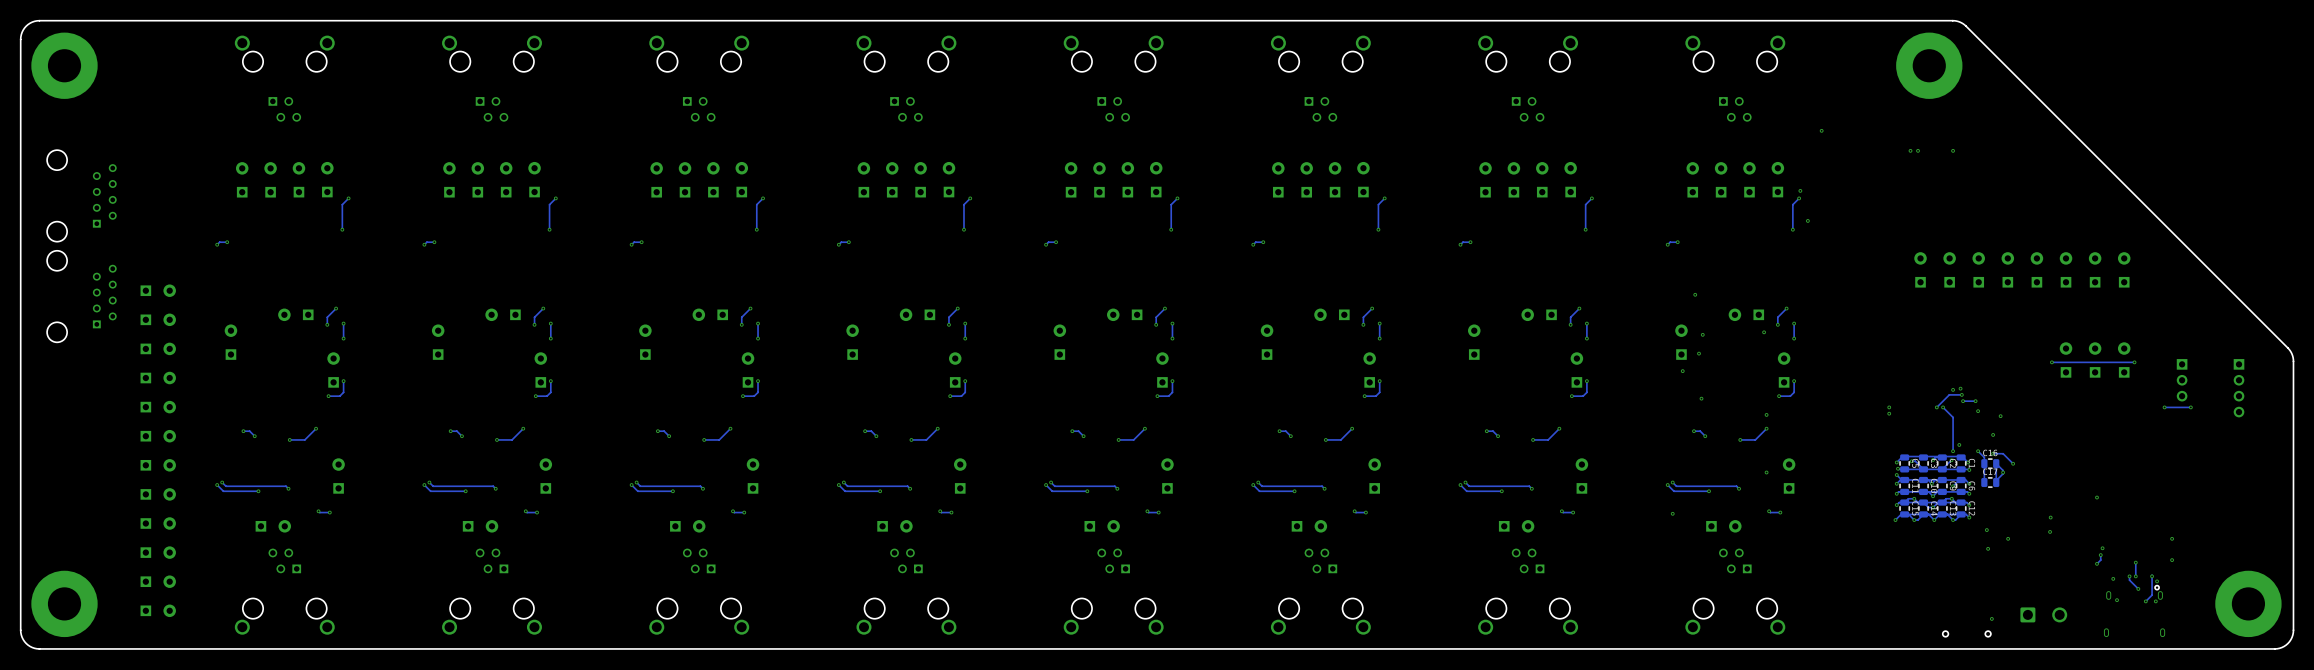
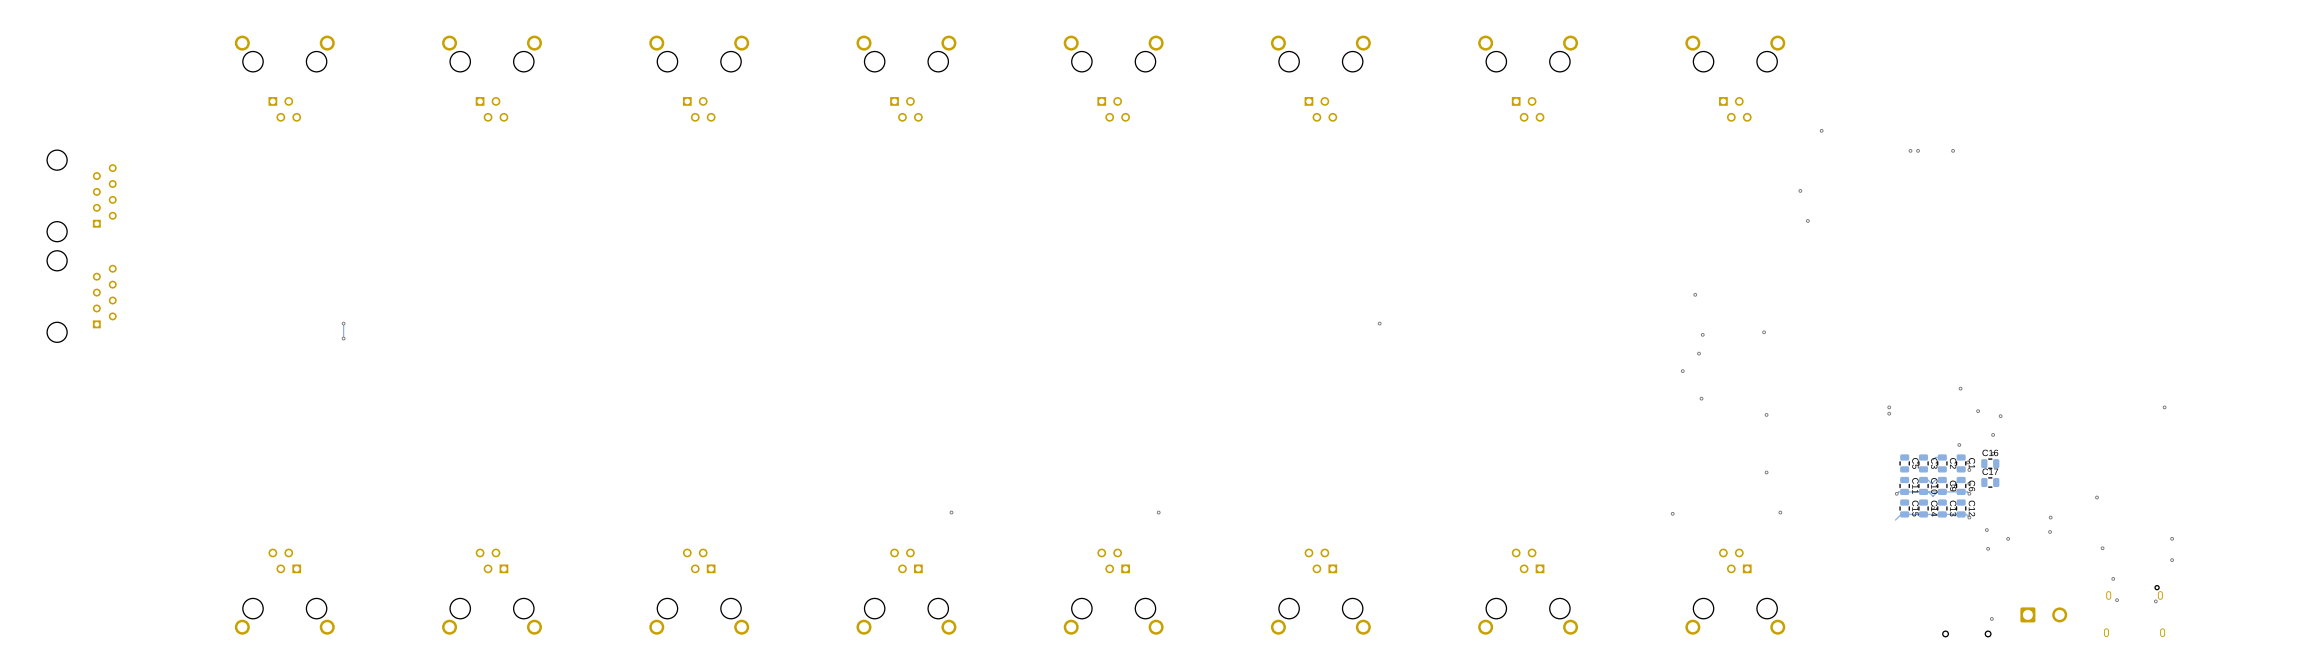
board edge: (1952, 20) (34, 21) (24, 28) (20, 39) (21, 635) (28, 645) (39, 648) (2274, 648) (2284, 646) (2290, 639) (2293, 630) (2293, 361) (2291, 352) (1966, 26) (1952, 20) -> none
part: (64, 65) -> none
part: (1929, 65) -> none
part: (242, 179) -> none
part: (270, 179) -> none
part: (298, 179) -> none
part: (327, 179) -> none
part: (449, 179) -> none
part: (477, 179) -> none
part: (506, 179) -> none
part: (534, 179) -> none
part: (656, 179) -> none
part: (685, 179) -> none
part: (713, 179) -> none
part: (741, 179) -> none
part: (863, 179) -> none
part: (892, 179) -> none
part: (920, 179) -> none
part: (948, 179) -> none
part: (1071, 179) -> none
part: (1099, 179) -> none
part: (1127, 179) -> none
part: (1156, 179) -> none
part: (1278, 179) -> none
part: (1306, 179) -> none
part: (1335, 179) -> none
part: (1363, 179) -> none
part: (1485, 179) -> none
part: (1513, 179) -> none
part: (1542, 179) -> none
part: (1570, 179) -> none
part: (1692, 179) -> none
part: (1721, 179) -> none
part: (1749, 179) -> none
part: (1777, 179) -> none
track: (348, 198) (342, 204) (342, 229) -> none
via: (348, 198) -> none
track: (555, 198) (549, 204) (549, 229) -> none
via: (555, 198) -> none
track: (763, 198) (756, 204) (756, 229) -> none
via: (763, 198) -> none
track: (970, 198) (963, 204) (963, 229) -> none
via: (970, 198) -> none
track: (1177, 198) (1171, 204) (1171, 229) -> none
via: (1177, 198) -> none
track: (1384, 198) (1378, 204) (1378, 229) -> none
via: (1384, 198) -> none
track: (1591, 198) (1585, 204) (1585, 229) -> none
via: (1591, 198) -> none
track: (1799, 198) (1792, 204) (1792, 229) -> none
via: (1799, 198) -> none
via: (342, 229) -> none
via: (549, 229) -> none
via: (756, 229) -> none
via: (963, 229) -> none
via: (1171, 229) -> none
via: (1378, 229) -> none
via: (1585, 229) -> none
via: (1792, 229) -> none
track: (227, 242) (219, 242) (217, 244) -> none
via: (227, 242) -> none
track: (434, 242) (426, 242) (424, 244) -> none
via: (434, 242) -> none
track: (641, 242) (634, 242) (631, 244) -> none
via: (641, 242) -> none
track: (848, 242) (841, 242) (838, 244) -> none
via: (848, 242) -> none
track: (1056, 242) (1048, 242) (1046, 244) -> none
via: (1056, 242) -> none
track: (1263, 242) (1255, 242) (1253, 244) -> none
via: (1263, 242) -> none
track: (1470, 242) (1463, 242) (1460, 244) -> none
via: (1470, 242) -> none
track: (1677, 242) (1670, 242) (1667, 244) -> none
via: (1677, 242) -> none
via: (217, 244) -> none
via: (424, 244) -> none
via: (631, 244) -> none
via: (838, 244) -> none
via: (1046, 244) -> none
via: (1253, 244) -> none
via: (1460, 244) -> none
via: (1667, 244) -> none
part: (1920, 269) -> none
part: (1949, 269) -> none
part: (1978, 269) -> none
part: (2007, 269) -> none
part: (2036, 269) -> none
part: (2066, 269) -> none
part: (2095, 269) -> none
part: (2124, 269) -> none
part: (158, 290) -> none
track: (336, 308) (327, 317) (327, 324) -> none
via: (336, 308) -> none
track: (543, 308) (534, 317) (534, 324) -> none
via: (543, 308) -> none
track: (750, 308) (741, 317) (741, 324) -> none
via: (750, 308) -> none
track: (957, 308) (948, 317) (948, 324) -> none
via: (957, 308) -> none
track: (1164, 308) (1156, 317) (1156, 324) -> none
via: (1164, 308) -> none
track: (1372, 308) (1363, 317) (1363, 324) -> none
via: (1372, 308) -> none
track: (1579, 308) (1570, 317) (1570, 324) -> none
via: (1579, 308) -> none
track: (1786, 308) (1777, 317) (1777, 324) -> none
via: (1786, 308) -> none
part: (295, 314) -> none
part: (503, 314) -> none
part: (710, 314) -> none
part: (917, 314) -> none
part: (1124, 314) -> none
part: (1331, 314) -> none
part: (1539, 314) -> none
part: (1746, 314) -> none
part: (158, 319) -> none
track: (550, 323) (550, 338) -> none
via: (550, 323) -> none
track: (758, 323) (758, 338) -> none
via: (758, 323) -> none
track: (965, 323) (965, 338) -> none
via: (965, 323) -> none
track: (1172, 323) (1172, 338) -> none
via: (1172, 323) -> none
track: (1379, 323) (1379, 338) -> none
track: (1586, 323) (1586, 338) -> none
via: (1586, 323) -> none
track: (1794, 323) (1794, 338) -> none
via: (1794, 323) -> none
via: (327, 324) -> none
via: (534, 324) -> none
via: (741, 324) -> none
via: (948, 324) -> none
via: (1156, 324) -> none
via: (1363, 324) -> none
via: (1570, 324) -> none
via: (1777, 324) -> none
via: (550, 338) -> none
via: (758, 338) -> none
via: (965, 338) -> none
via: (1172, 338) -> none
via: (1379, 338) -> none
via: (1586, 338) -> none
via: (1794, 338) -> none
part: (230, 342) -> none
part: (438, 342) -> none
part: (645, 342) -> none
part: (852, 342) -> none
part: (1059, 342) -> none
part: (1267, 342) -> none
part: (1474, 342) -> none
part: (1681, 342) -> none
part: (158, 348) -> none
part: (2066, 359) -> none
part: (2095, 359) -> none
part: (2124, 359) -> none
via: (2051, 362) -> none
track: (2134, 362) (2051, 362) -> none
via: (2134, 362) -> none
part: (333, 370) -> none
part: (540, 370) -> none
part: (748, 370) -> none
part: (955, 370) -> none
part: (1162, 370) -> none
part: (1369, 370) -> none
part: (1576, 370) -> none
part: (1784, 370) -> none
part: (158, 378) -> none
part: (2182, 380) -> none
track: (343, 381) (343, 392) (339, 396) (328, 396) -> none
via: (343, 381) -> none
track: (550, 381) (550, 392) (547, 396) (535, 396) -> none
via: (550, 381) -> none
track: (758, 381) (758, 392) (754, 396) (743, 396) -> none
via: (758, 381) -> none
track: (965, 381) (965, 392) (961, 396) (950, 396) -> none
via: (965, 381) -> none
track: (1172, 381) (1172, 392) (1168, 396) (1157, 396) -> none
via: (1172, 381) -> none
track: (1379, 381) (1379, 392) (1375, 396) (1364, 396) -> none
via: (1379, 381) -> none
track: (1586, 381) (1586, 392) (1583, 396) (1571, 396) -> none
via: (1586, 381) -> none
track: (1794, 381) (1794, 392) (1790, 396) (1779, 396) -> none
via: (1794, 381) -> none
part: (2239, 388) -> none
via: (1953, 389) -> none
track: (1961, 394) (1949, 394) (1936, 407) -> none
via: (1961, 394) -> none
via: (328, 396) -> none
via: (535, 396) -> none
via: (743, 396) -> none
via: (950, 396) -> none
via: (1157, 396) -> none
via: (1364, 396) -> none
via: (1571, 396) -> none
via: (1779, 396) -> none
via: (1963, 401) -> none
track: (1975, 401) (1963, 401) -> none
via: (1975, 401) -> none
part: (158, 407) -> none
via: (1936, 407) -> none
track: (1943, 407) (1953, 417) (1953, 451) -> none
via: (1943, 407) -> none
track: (2190, 407) (2164, 407) -> none
via: (2190, 407) -> none
track: (316, 428) (304, 439) (289, 439) -> none
via: (316, 428) -> none
track: (523, 428) (512, 439) (496, 439) -> none
via: (523, 428) -> none
track: (730, 428) (719, 439) (704, 439) -> none
via: (730, 428) -> none
track: (937, 428) (926, 439) (911, 439) -> none
via: (937, 428) -> none
track: (1144, 428) (1133, 439) (1118, 439) -> none
via: (1144, 428) -> none
track: (1352, 428) (1340, 439) (1325, 439) -> none
via: (1352, 428) -> none
track: (1559, 428) (1548, 439) (1533, 439) -> none
via: (1559, 428) -> none
track: (1766, 428) (1755, 439) (1740, 439) -> none
via: (1766, 428) -> none
track: (243, 431) (249, 431) (254, 436) -> none
via: (243, 431) -> none
track: (450, 431) (456, 431) (461, 436) -> none
via: (450, 431) -> none
track: (657, 431) (664, 431) (669, 436) -> none
via: (657, 431) -> none
track: (865, 431) (871, 431) (876, 436) -> none
via: (865, 431) -> none
track: (1072, 431) (1078, 431) (1083, 436) -> none
via: (1072, 431) -> none
track: (1279, 431) (1285, 431) (1290, 436) -> none
via: (1279, 431) -> none
track: (1486, 431) (1493, 431) (1498, 436) -> none
via: (1486, 431) -> none
track: (1693, 431) (1700, 431) (1705, 436) -> none
via: (1693, 431) -> none
part: (158, 436) -> none
via: (254, 436) -> none
via: (461, 436) -> none
via: (669, 436) -> none
via: (876, 436) -> none
via: (1083, 436) -> none
via: (1290, 436) -> none
via: (1498, 436) -> none
via: (1705, 436) -> none
via: (289, 439) -> none
via: (496, 439) -> none
via: (704, 439) -> none
via: (911, 439) -> none
via: (1118, 439) -> none
via: (1325, 439) -> none
via: (1533, 439) -> none
via: (1740, 439) -> none
via: (1953, 451) -> none
track: (1978, 451) (1984, 457) (1984, 482) -> none
via: (1978, 451) -> none
track: (1993, 453) (2003, 453) (2013, 463) -> none
via: (1933, 459) -> none
track: (1951, 460) (1942, 469) -> none
via: (1951, 460) -> none
track: (1911, 461) (1915, 461) (1923, 469) -> none
via: (1911, 461) -> none
via: (1896, 462) -> none
track: (1968, 462) (1960, 456) (1905, 456) (1896, 462) -> none
via: (2013, 463) -> none
part: (158, 465) -> none
track: (1897, 468) (1969, 469) -> none
via: (1897, 468) -> none
via: (2003, 472) -> none
track: (1896, 475) (1901, 480) -> none
via: (1896, 475) -> none
part: (338, 476) -> none
part: (545, 476) -> none
part: (753, 476) -> none
part: (960, 476) -> none
part: (1167, 476) -> none
part: (1374, 476) -> none
part: (1581, 476) -> none
part: (1789, 476) -> none
track: (1996, 480) (2003, 473) (2003, 470) (1996, 463) (1996, 482) -> none
track: (222, 482) (225, 486) (286, 486) (288, 488) -> none
via: (222, 482) -> none
track: (429, 482) (433, 486) (493, 486) (495, 488) -> none
via: (429, 482) -> none
track: (636, 482) (640, 486) (700, 486) (702, 488) -> none
via: (636, 482) -> none
track: (843, 482) (847, 486) (907, 486) (910, 488) -> none
via: (843, 482) -> none
track: (1051, 482) (1054, 486) (1114, 486) (1117, 488) -> none
via: (1051, 482) -> none
track: (1258, 482) (1262, 486) (1322, 486) (1324, 488) -> none
via: (1258, 482) -> none
track: (1465, 482) (1469, 486) (1529, 486) (1531, 488) -> none
via: (1465, 482) -> none
track: (1672, 482) (1676, 486) (1736, 486) (1739, 488) -> none
via: (1672, 482) -> none
via: (1896, 483) -> none
via: (1931, 483) -> none
track: (1969, 483) (1965, 480) (1900, 480) (1896, 483) -> none
track: (217, 485) (223, 491) (258, 491) -> none
via: (217, 485) -> none
track: (424, 485) (430, 491) (465, 491) -> none
via: (424, 485) -> none
track: (631, 485) (637, 491) (672, 491) -> none
via: (631, 485) -> none
track: (838, 485) (845, 491) (880, 491) -> none
via: (838, 485) -> none
track: (1046, 485) (1052, 491) (1087, 491) -> none
via: (1046, 485) -> none
track: (1253, 485) (1259, 491) (1294, 491) -> none
via: (1253, 485) -> none
track: (1460, 485) (1466, 491) (1501, 491) -> none
via: (1460, 485) -> none
track: (1667, 485) (1673, 491) (1709, 491) -> none
via: (1667, 485) -> none
via: (288, 488) -> none
via: (495, 488) -> none
via: (702, 488) -> none
via: (910, 488) -> none
via: (1117, 488) -> none
via: (1324, 488) -> none
via: (1531, 488) -> none
via: (1739, 488) -> none
via: (258, 491) -> none
via: (465, 491) -> none
via: (672, 491) -> none
via: (880, 491) -> none
via: (1087, 491) -> none
via: (1294, 491) -> none
via: (1501, 491) -> none
via: (1709, 491) -> none
part: (158, 494) -> none
via: (1933, 496) -> none
via: (1914, 498) -> none
via: (1951, 498) -> none
track: (1918, 502) (1914, 498) (1908, 498) (1904, 502) -> none
track: (1938, 502) (1933, 507) (1928, 507) (1923, 502) -> none
track: (1955, 502) (1951, 498) (1946, 498) (1942, 502) -> none
via: (1896, 505) -> none
track: (1969, 505) (1966, 502) (1899, 502) (1896, 505) -> none
via: (1969, 505) -> none
track: (318, 511) (329, 512) -> none
via: (318, 511) -> none
track: (525, 511) (537, 512) -> none
via: (525, 511) -> none
track: (733, 511) (744, 512) -> none
via: (733, 511) -> none
track: (940, 511) (951, 512) -> none
via: (940, 511) -> none
track: (1147, 511) (1158, 512) -> none
via: (1147, 511) -> none
track: (1354, 511) (1365, 512) -> none
via: (1354, 511) -> none
track: (1561, 511) (1573, 512) -> none
via: (1561, 511) -> none
track: (1769, 511) (1780, 512) -> none
via: (1769, 511) -> none
via: (329, 512) -> none
via: (537, 512) -> none
via: (744, 512) -> none
via: (1365, 512) -> none
via: (1573, 512) -> none
track: (1923, 514) (1917, 520) (1914, 520) (1908, 514) -> none
track: (1939, 514) (1934, 520) (1928, 514) -> none
track: (1961, 514) (1955, 520) (1947, 514) -> none
via: (1895, 520) -> none
via: (1914, 520) -> none
via: (1934, 520) -> none
via: (1953, 520) -> none
part: (158, 523) -> none
part: (273, 526) -> none
part: (480, 526) -> none
part: (687, 526) -> none
part: (894, 526) -> none
part: (1102, 526) -> none
part: (1309, 526) -> none
part: (1516, 526) -> none
part: (1723, 526) -> none
part: (158, 552) -> none
track: (2100, 555) (2100, 560) (2096, 563) -> none
via: (2100, 555) -> none
track: (2135, 562) (2135, 576) -> none
via: (2135, 562) -> none
via: (2096, 563) -> none
track: (2152, 575) (2152, 595) (2145, 601) -> none
track: (2129, 576) (2129, 580) (2138, 588) -> none
via: (2129, 576) -> none
via: (2135, 576) -> none
via: (2152, 576) -> none
part: (158, 581) -> none
via: (2157, 581) -> none
via: (2138, 588) -> none
via: (2145, 601) -> none
part: (64, 603) -> none
part: (2248, 603) -> none
part: (158, 610) -> none

